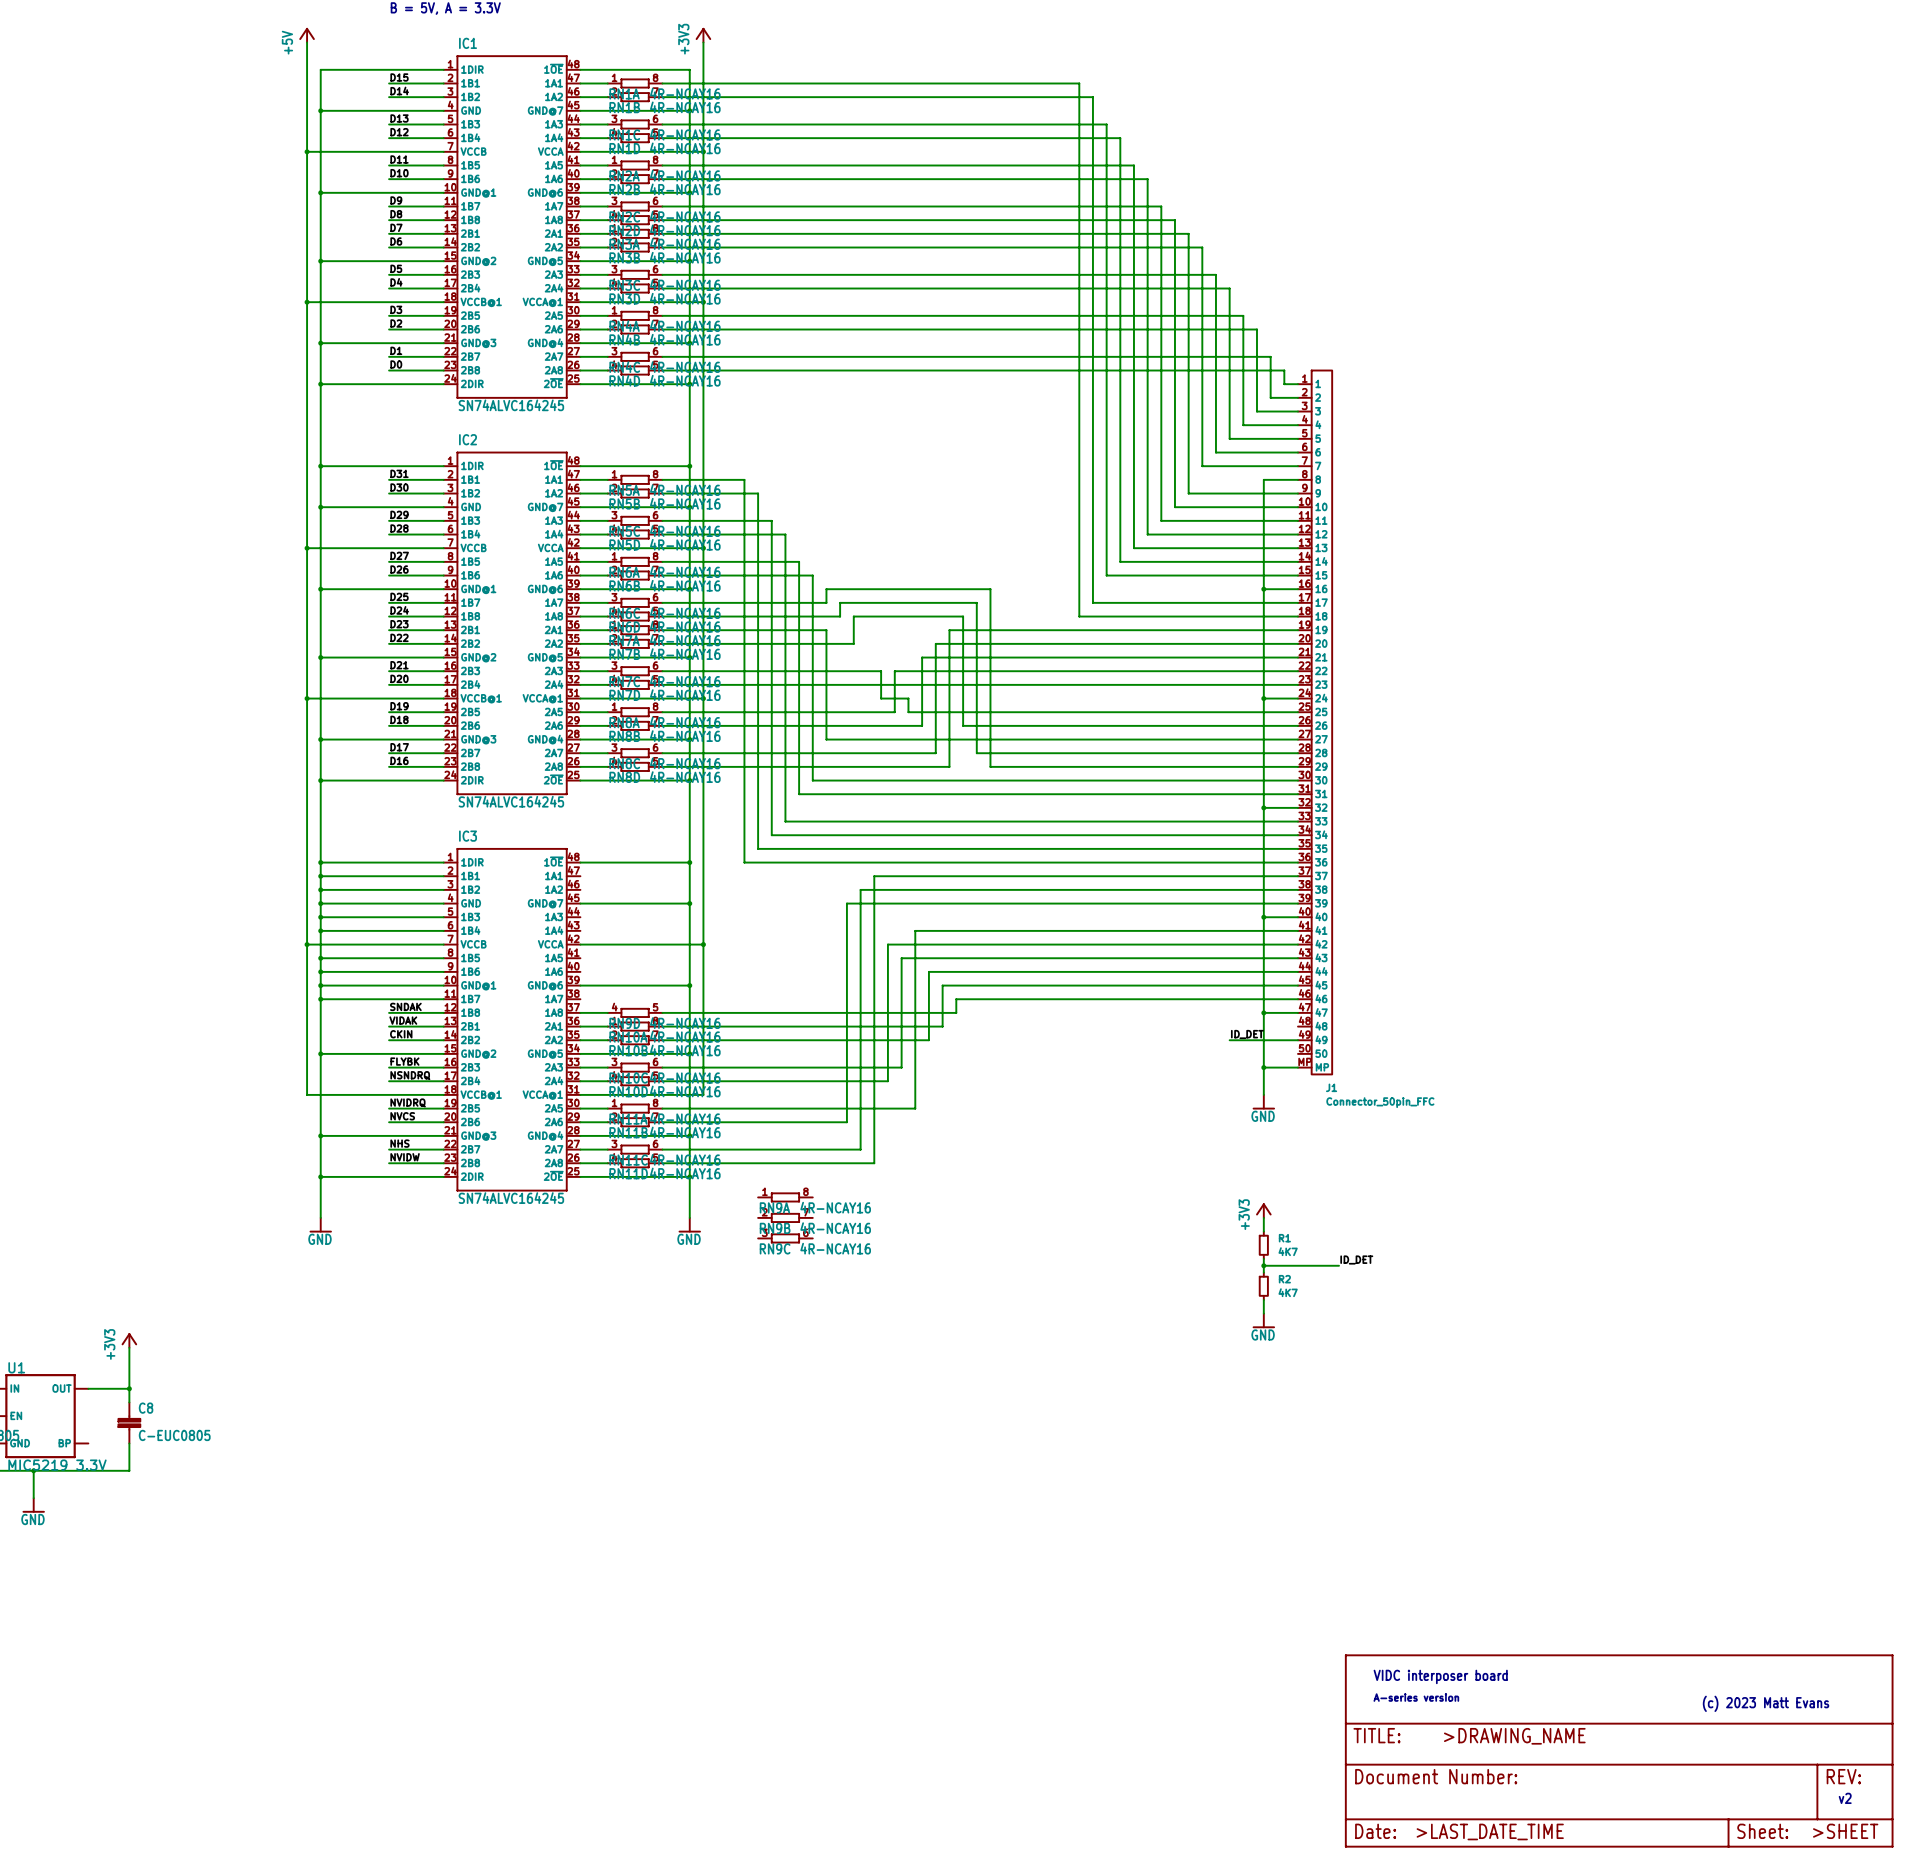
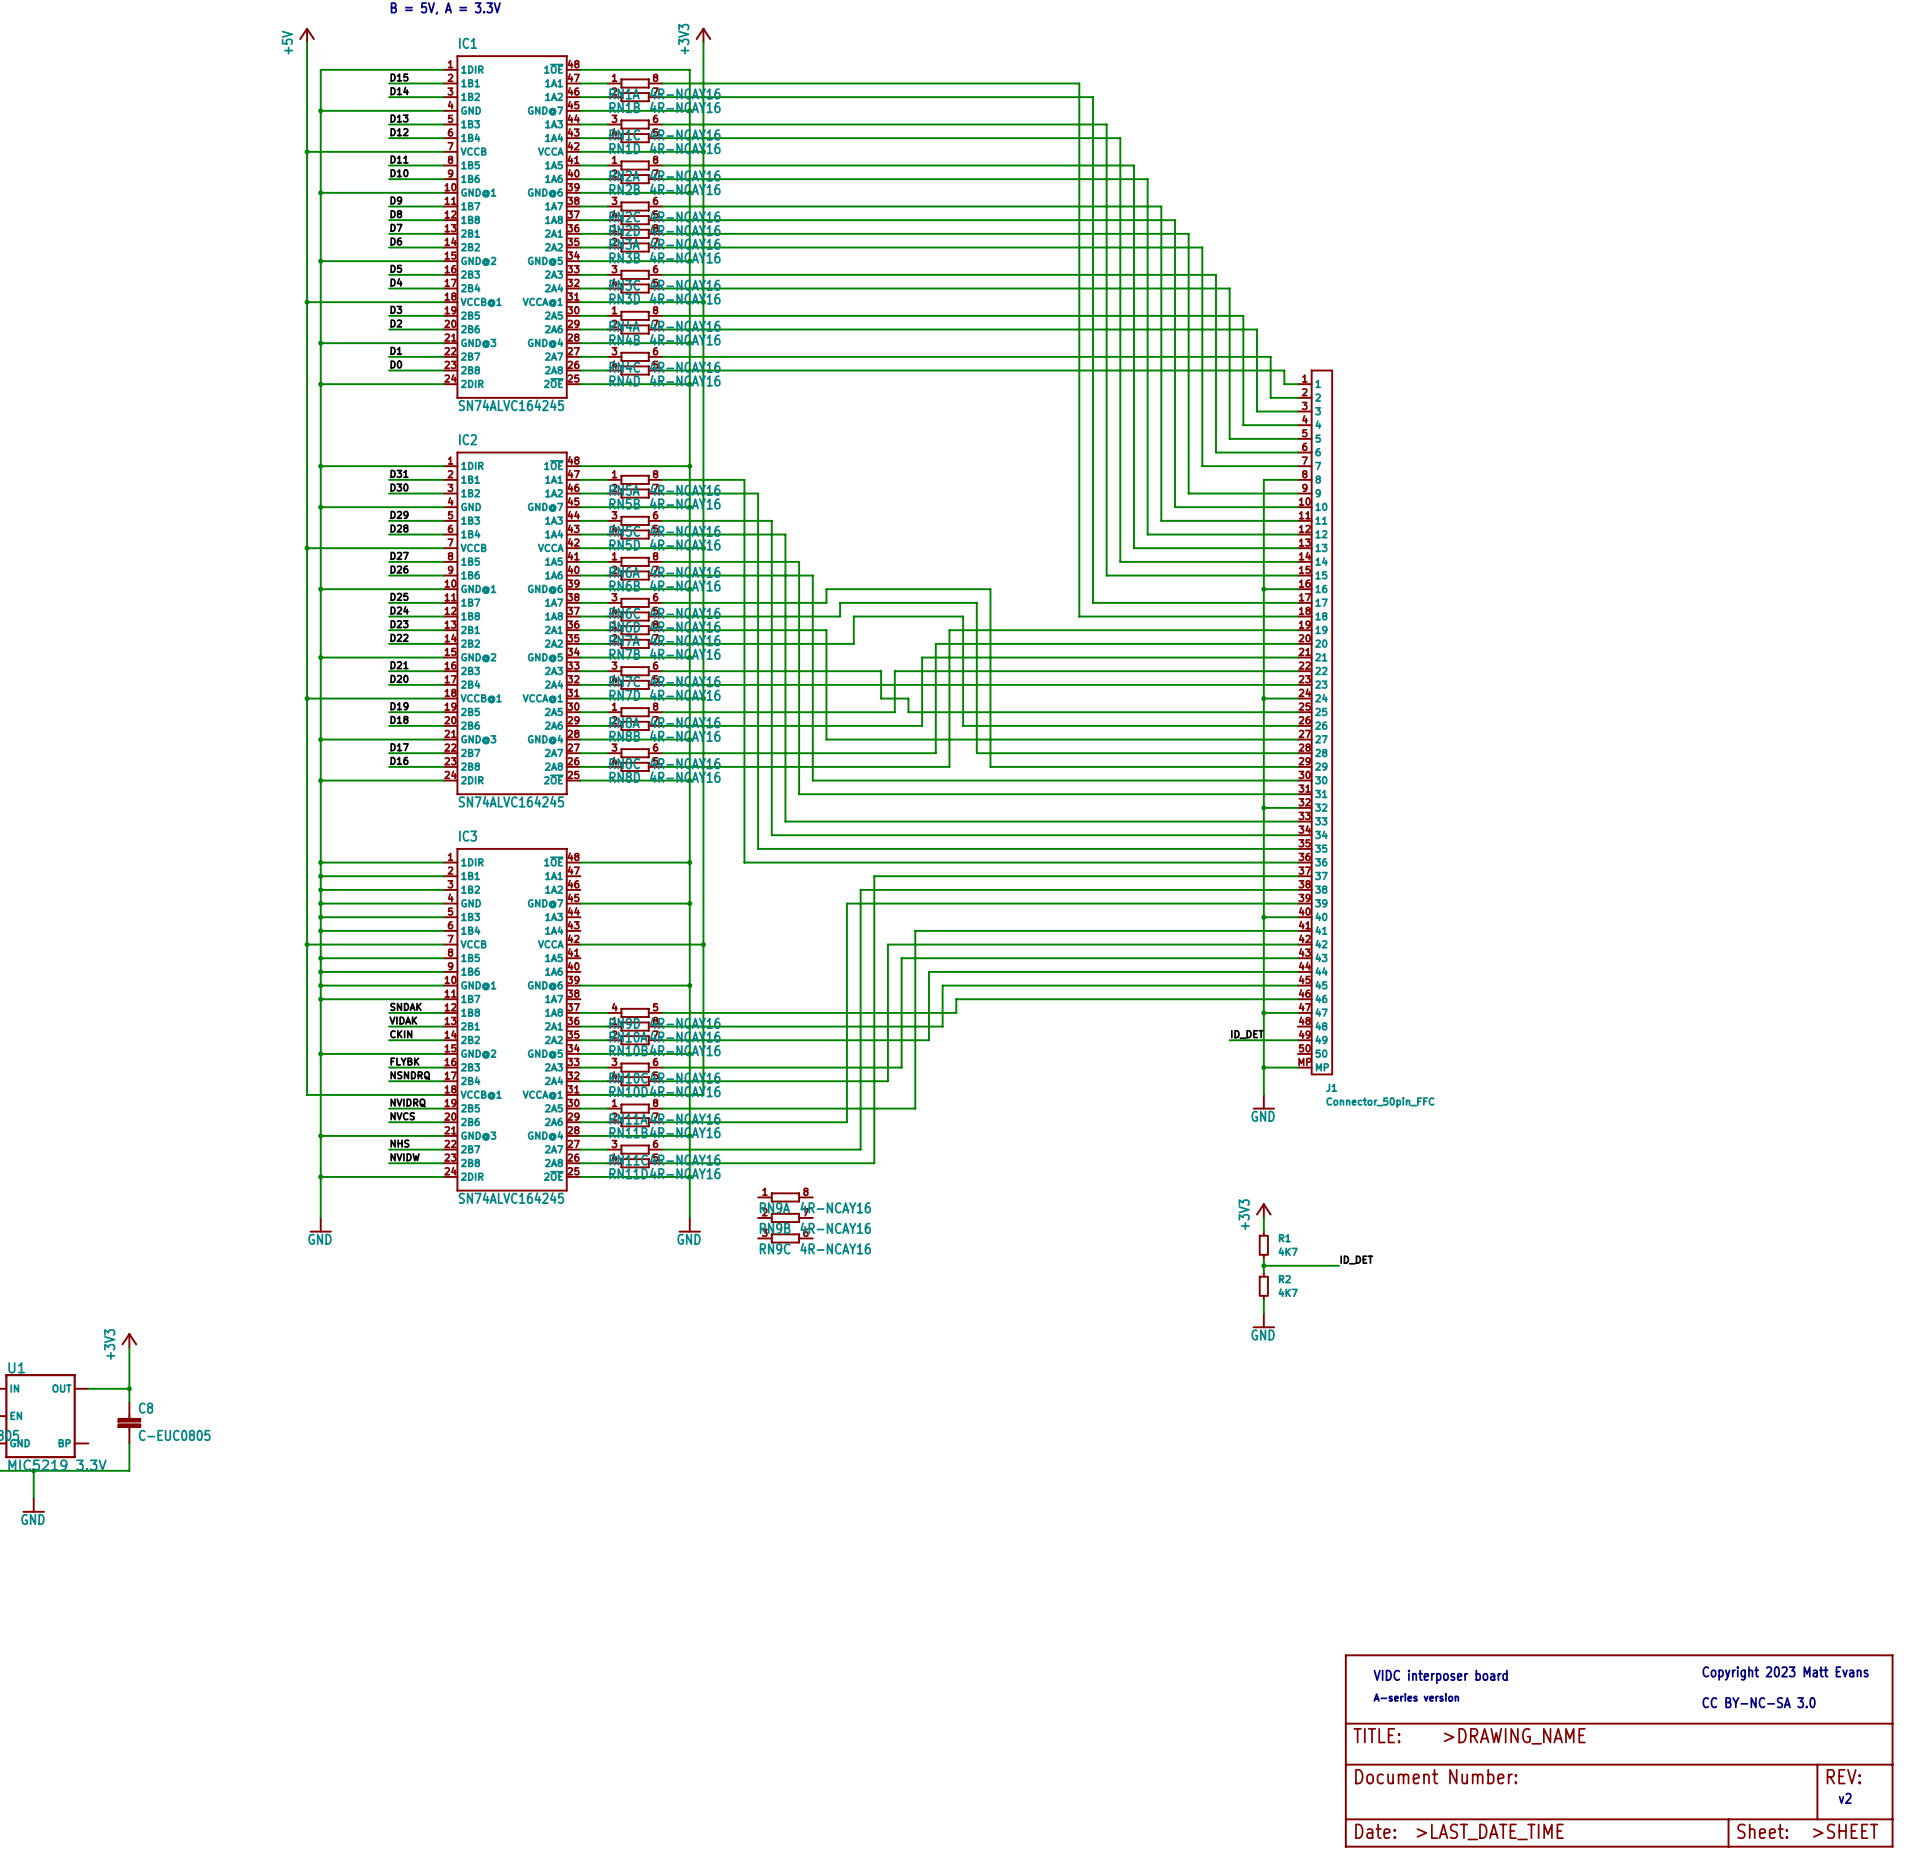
text: none -> Copyright 2023 Matt Evans (1785, 1673)
text: (c) 2023 Matt Evans (1766, 1703) -> CC BY-NC-SA 3.0 (1759, 1702)

